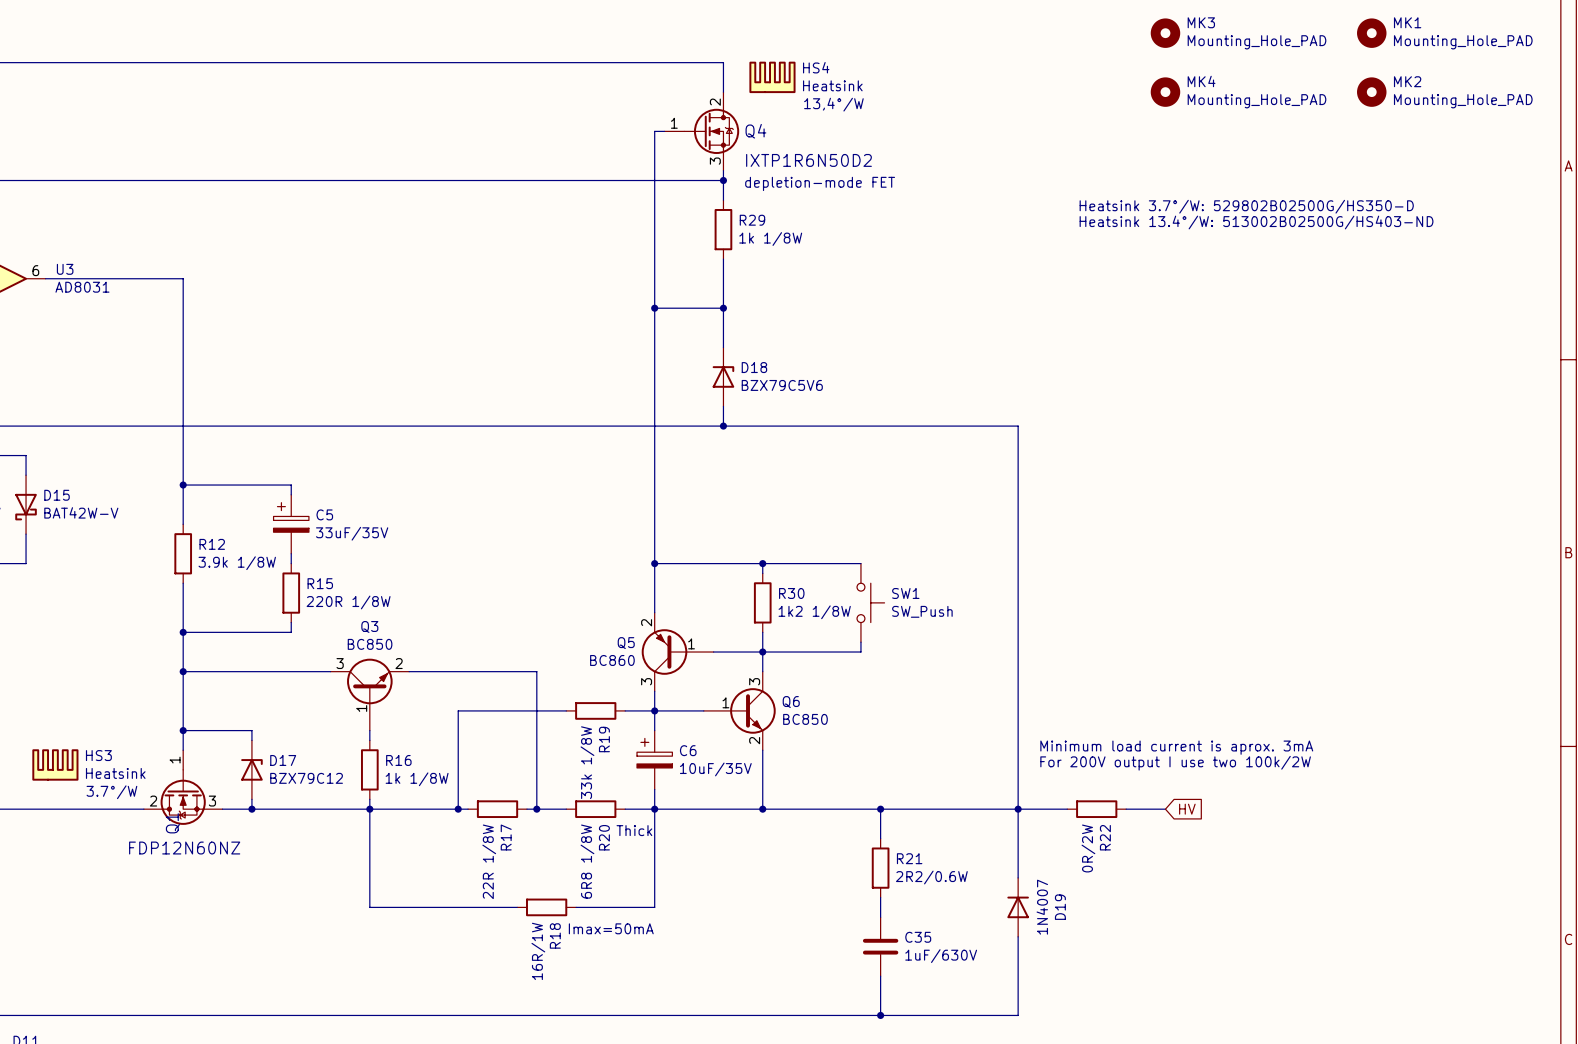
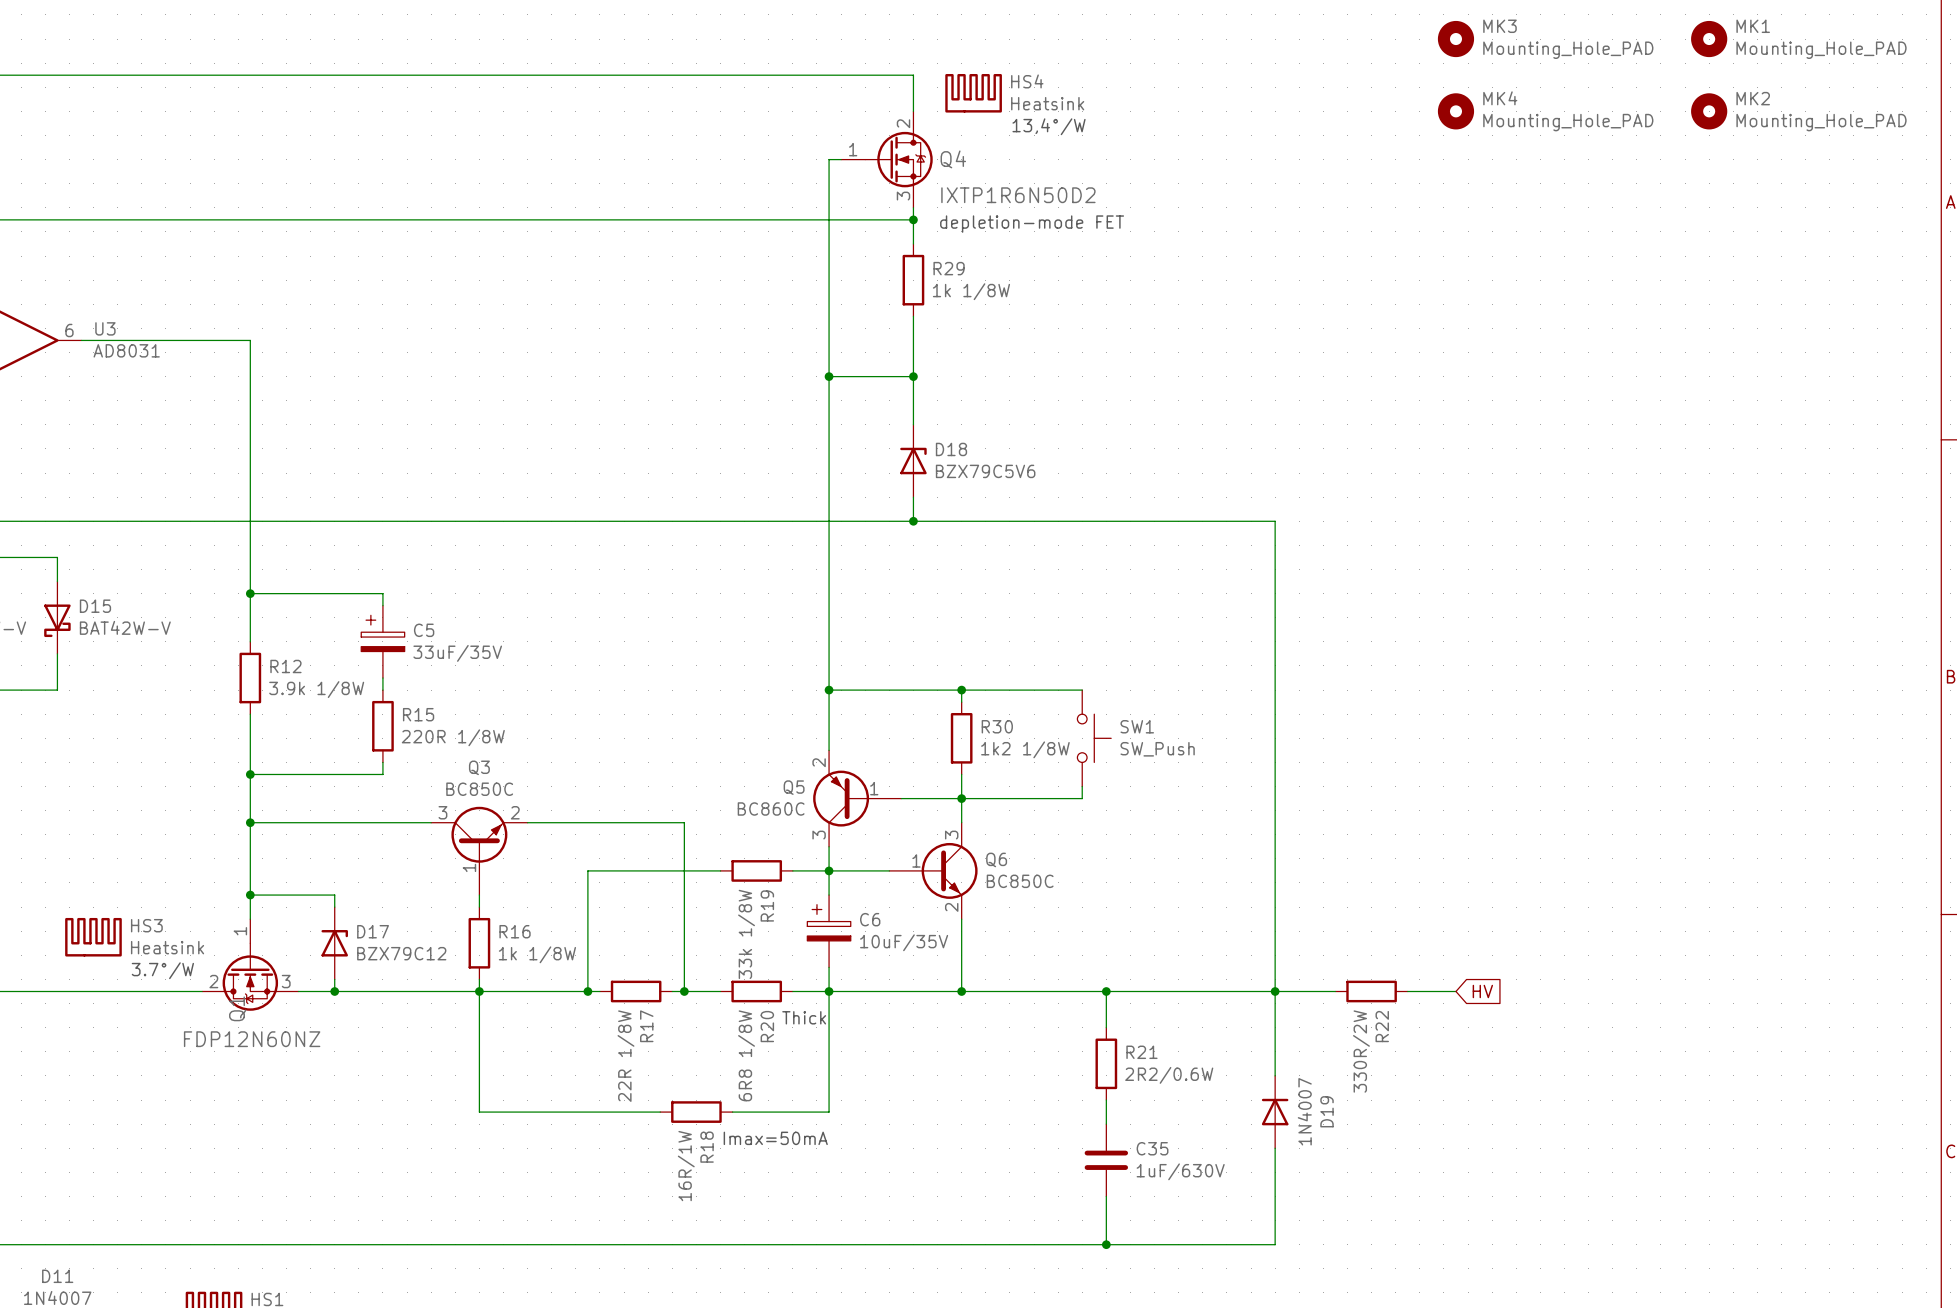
text: Heatsink 3.7°/W: 529802B02500G/HS350-D (1246, 206) -> none
text: Heatsink 13.4°/W: 513002B02500G/HS403-ND (1256, 222) -> none
Q3 value: BC850 (370, 644) -> BC850C (479, 789)
Q5 value: BC860 (612, 660) -> BC860C (771, 808)
Q6 value: BC850 (805, 719) -> BC850C (1020, 881)
text: Minimum load current is aprox. 3mA (1176, 747) -> none
text: For 200V output I use two 100k/2W (1175, 763) -> none
R22 value: 0R/2W (1088, 848) -> 330R/2W (1361, 1051)

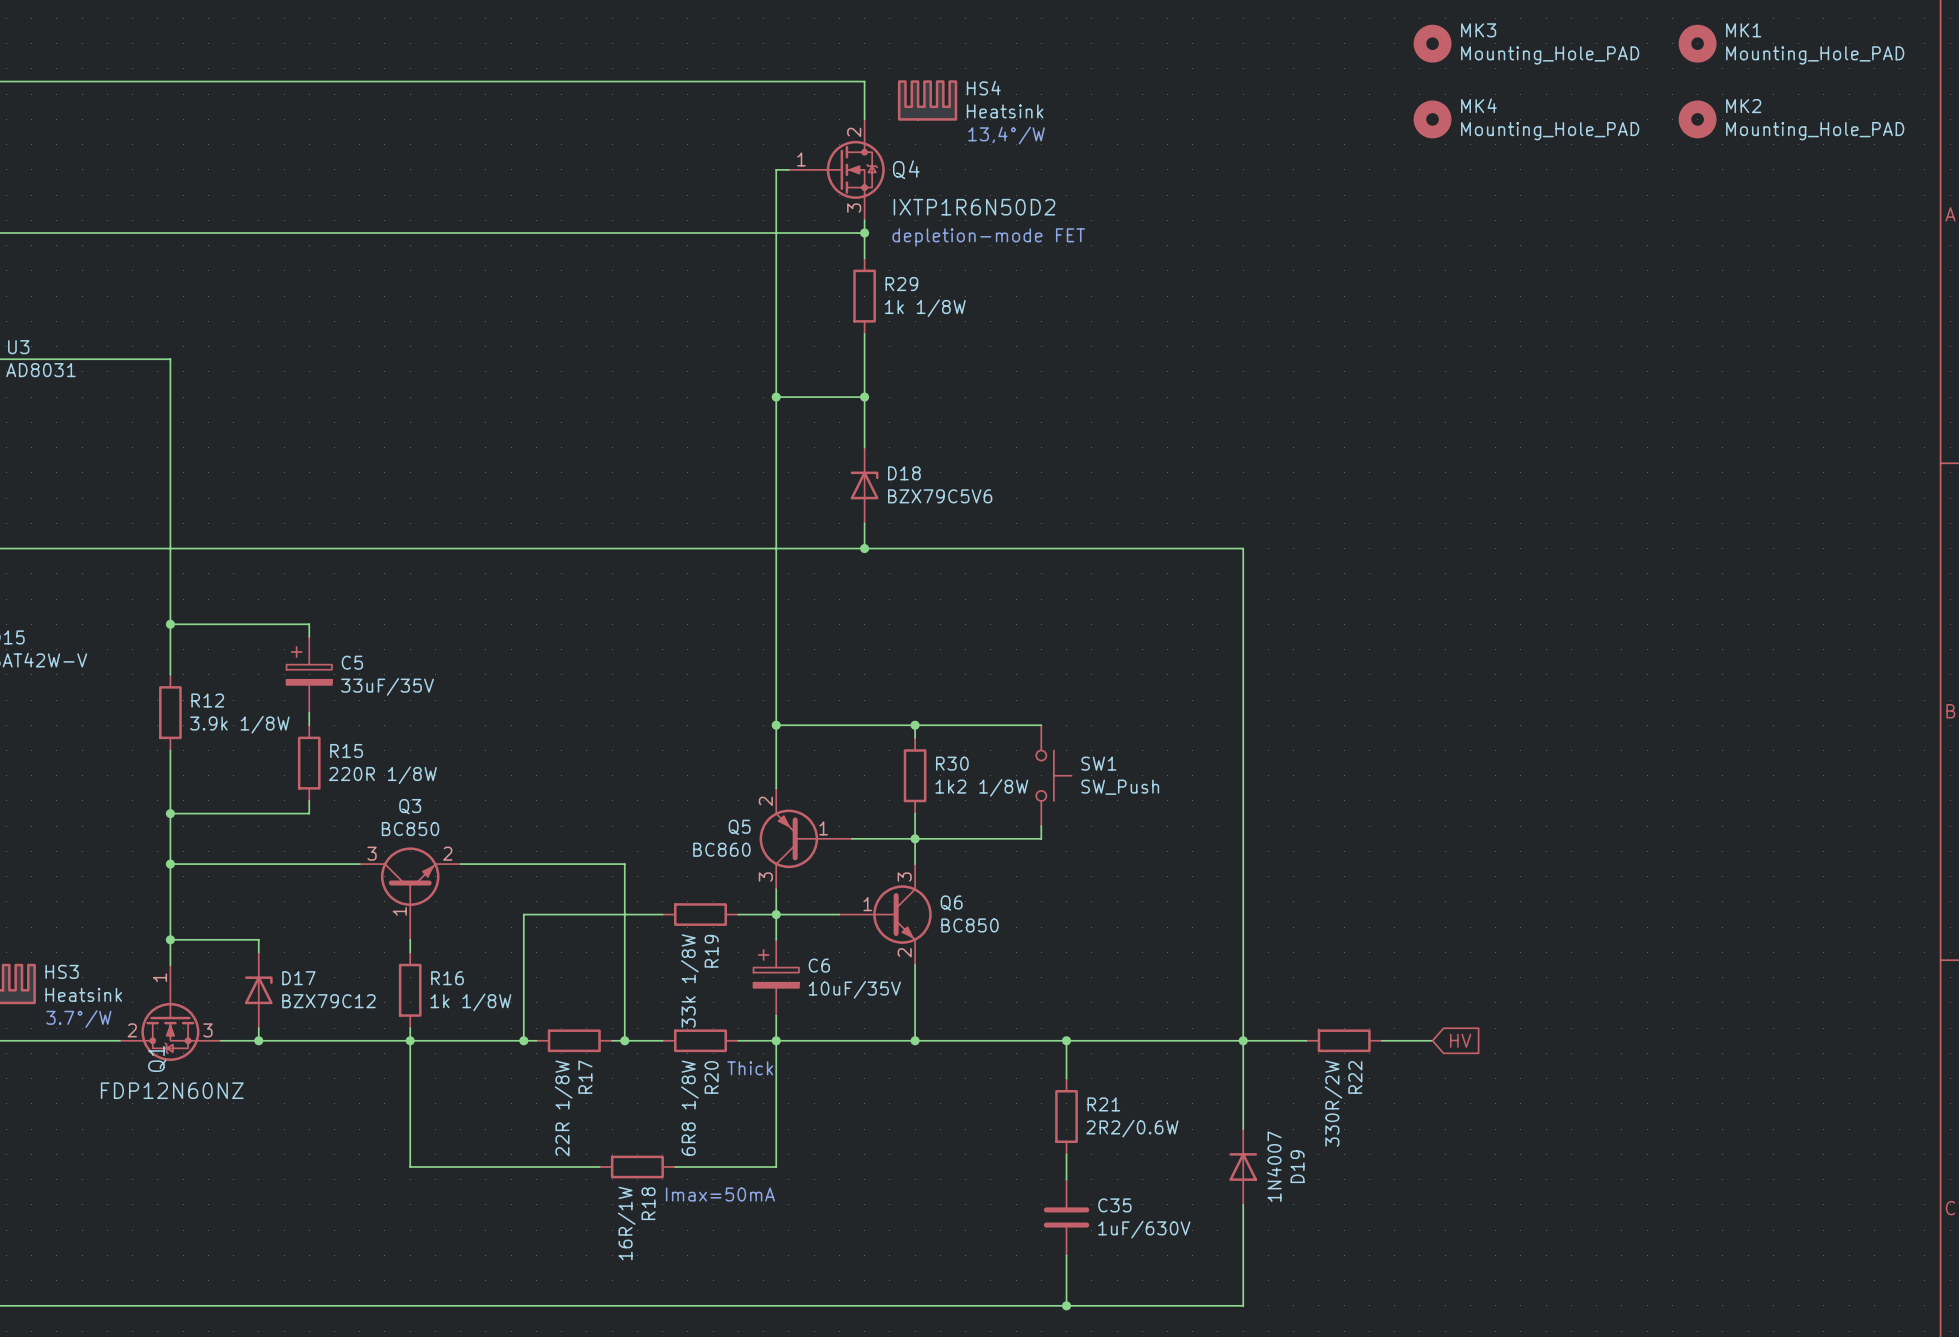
Q3 value: BC850C (479, 789) -> BC850 (410, 829)
Q5 value: BC860C (771, 808) -> BC860 (721, 849)
Q6 value: BC850C (1020, 881) -> BC850 (969, 925)

